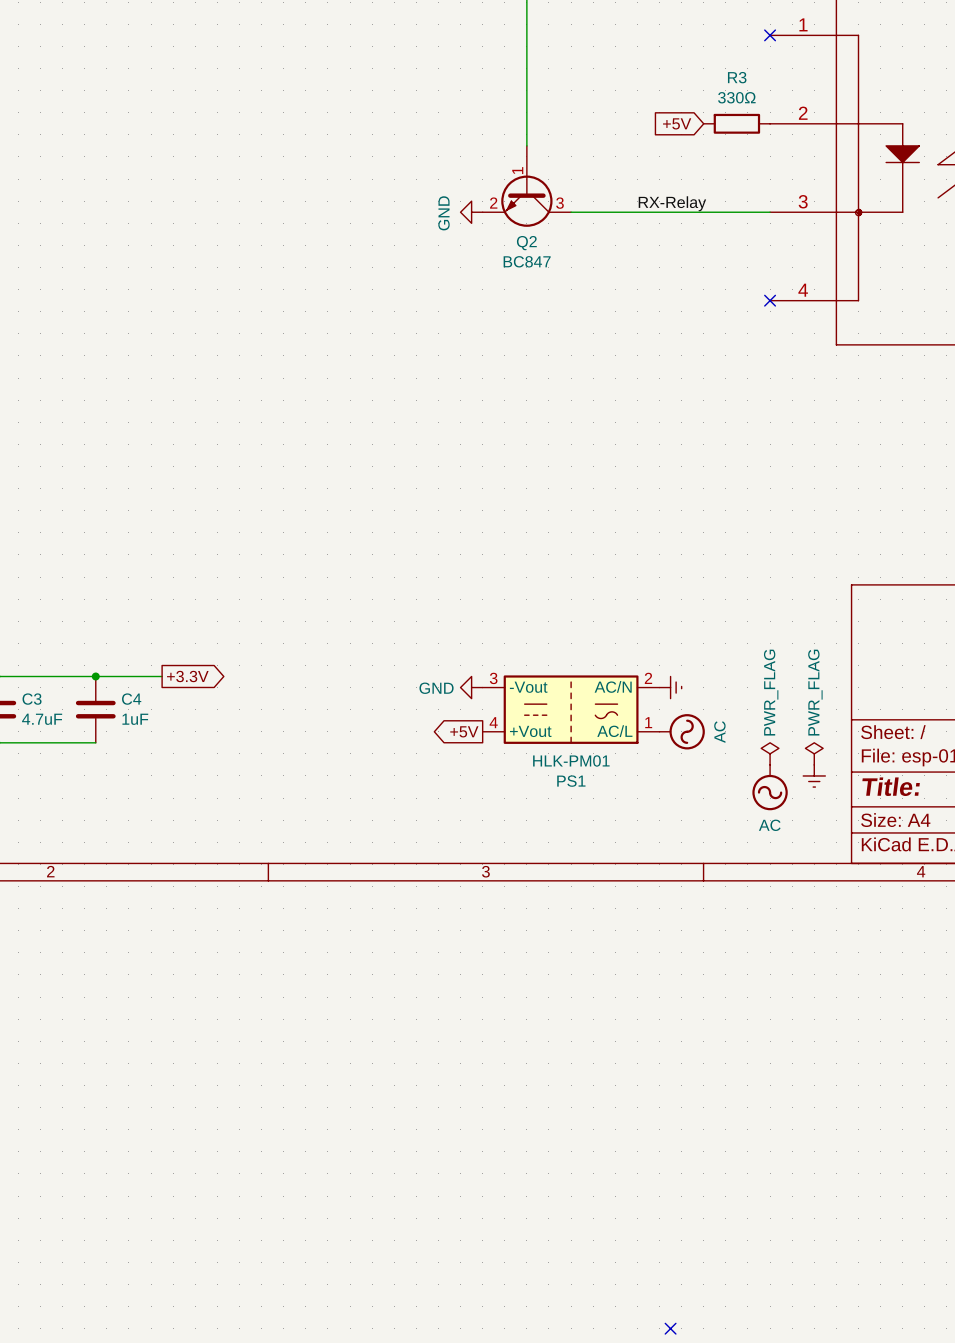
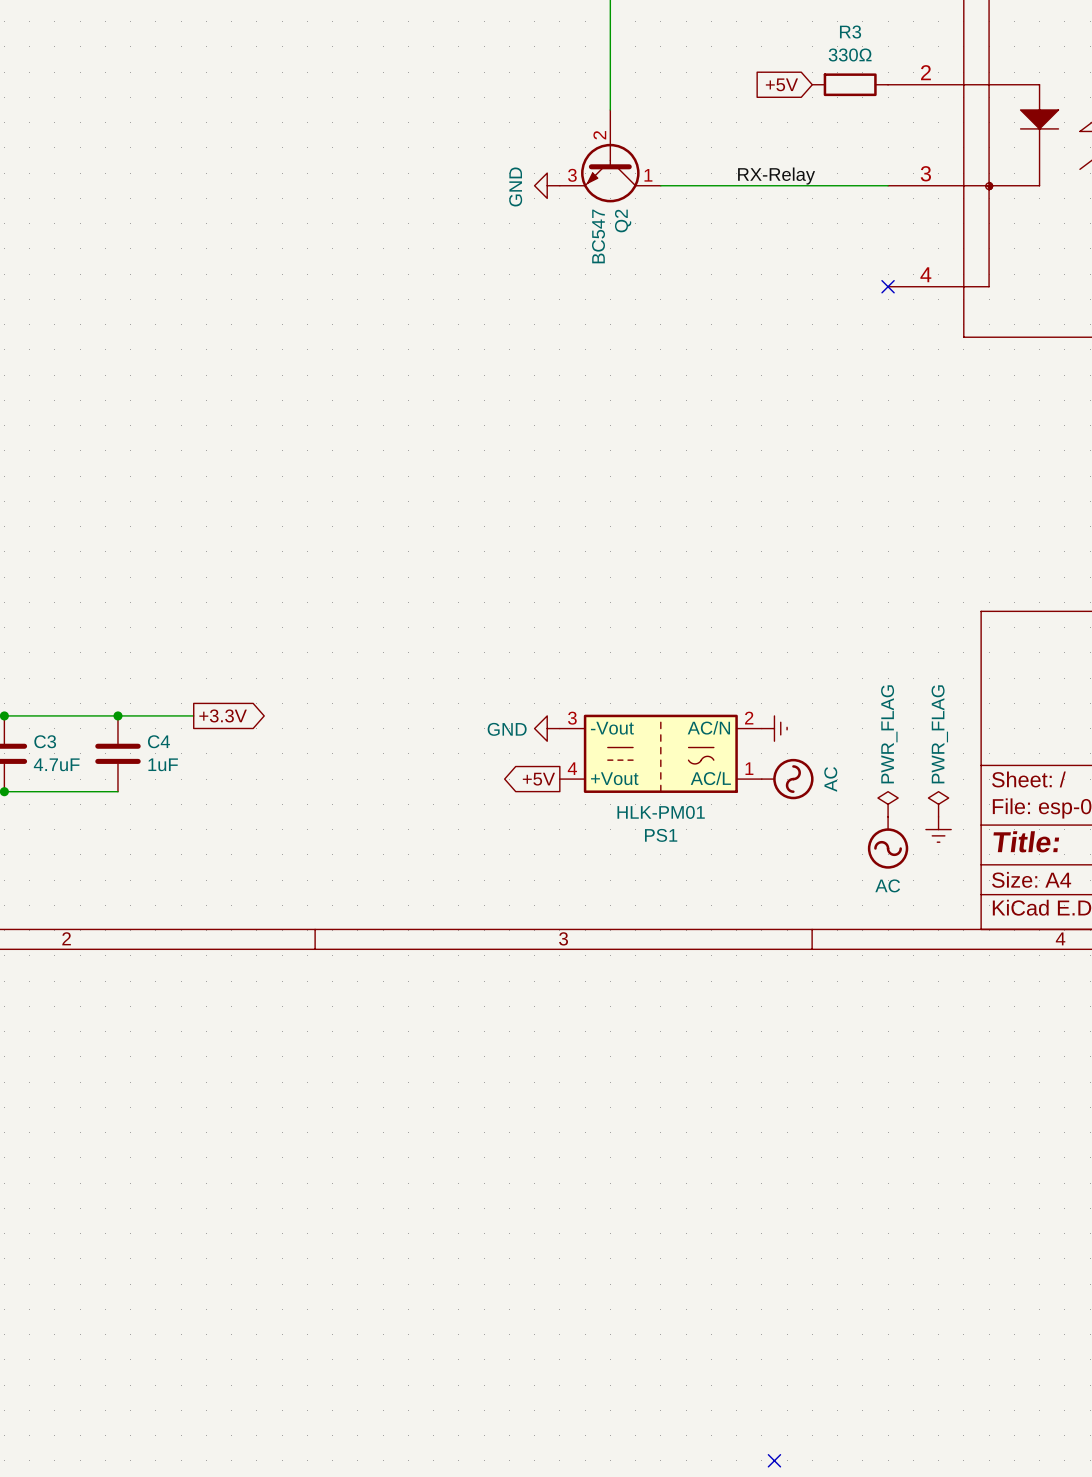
Q2 symbol: [482, 145, 572, 227] -> [559, 109, 661, 203]
Q2 value: BC847 (527, 261) -> BC547 (598, 236)

